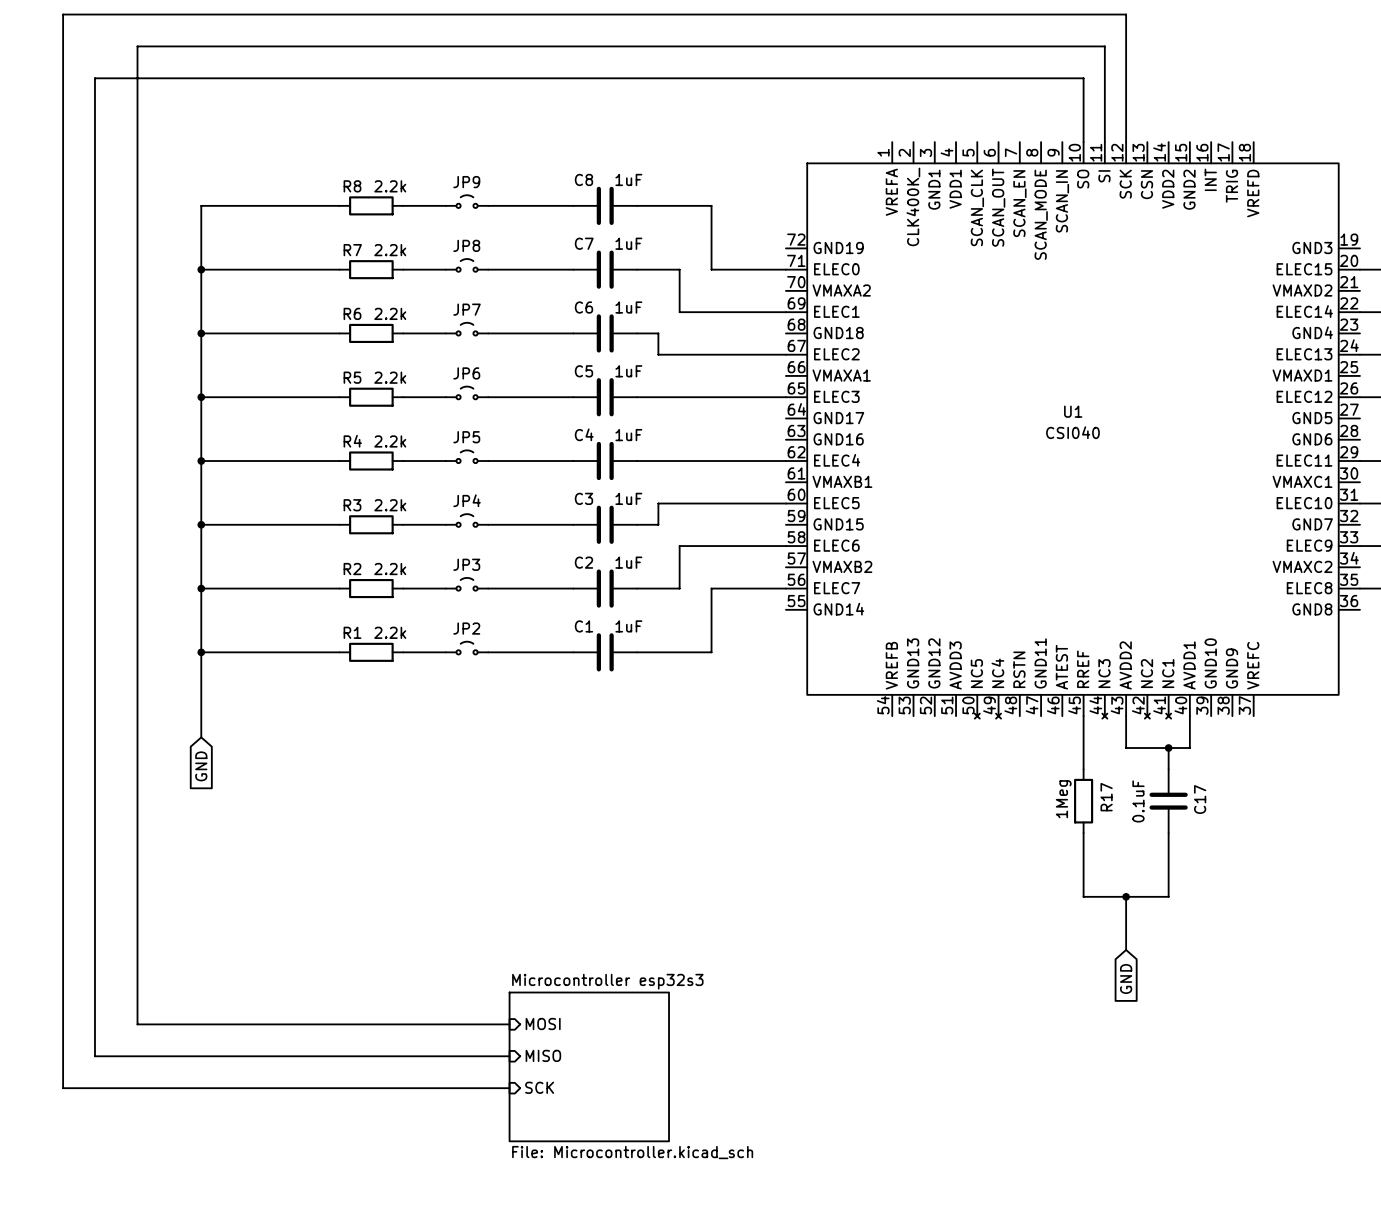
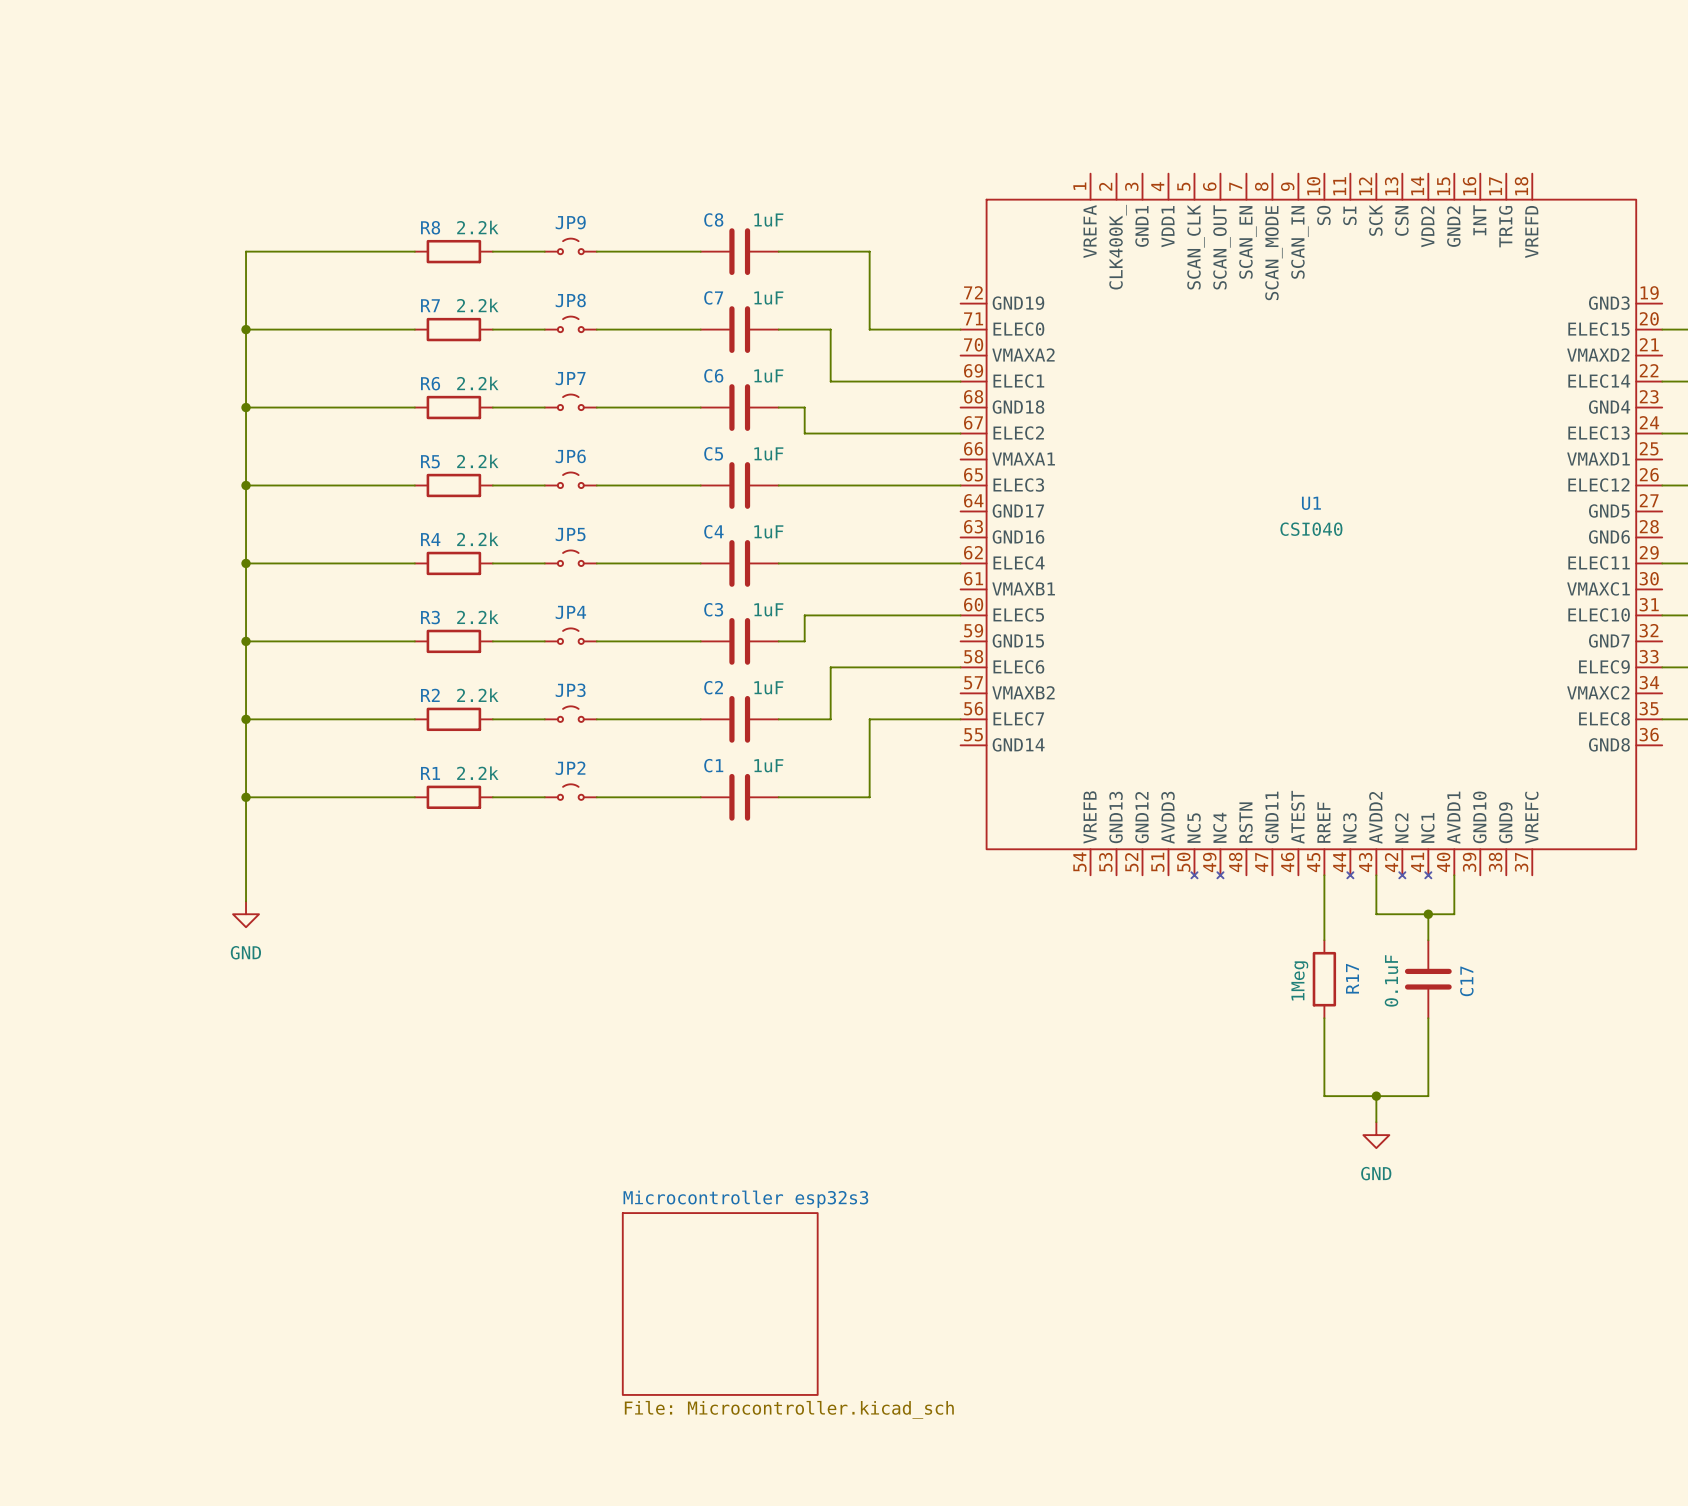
wire: (1083, 142) (1083, 78) (94, 78) (94, 1056) (509, 1056) -> none
wire: (1104, 142) (1104, 46) (137, 46) (137, 1024) (509, 1024) -> none
wire: (1126, 142) (1126, 14) (63, 14) (63, 1088) (509, 1088) -> none
power symbol: none -> GND (246, 914)
global label: GND (201, 766) -> none
wire: (1126, 918) (1126, 949) -> none
power symbol: none -> GND (1376, 1135)
global label: GND (1126, 978) -> none
sheet pin: MOSI (543, 1024) -> none
sheet pin: MISO (543, 1055) -> none
sheet pin: SCK (539, 1087) -> none

